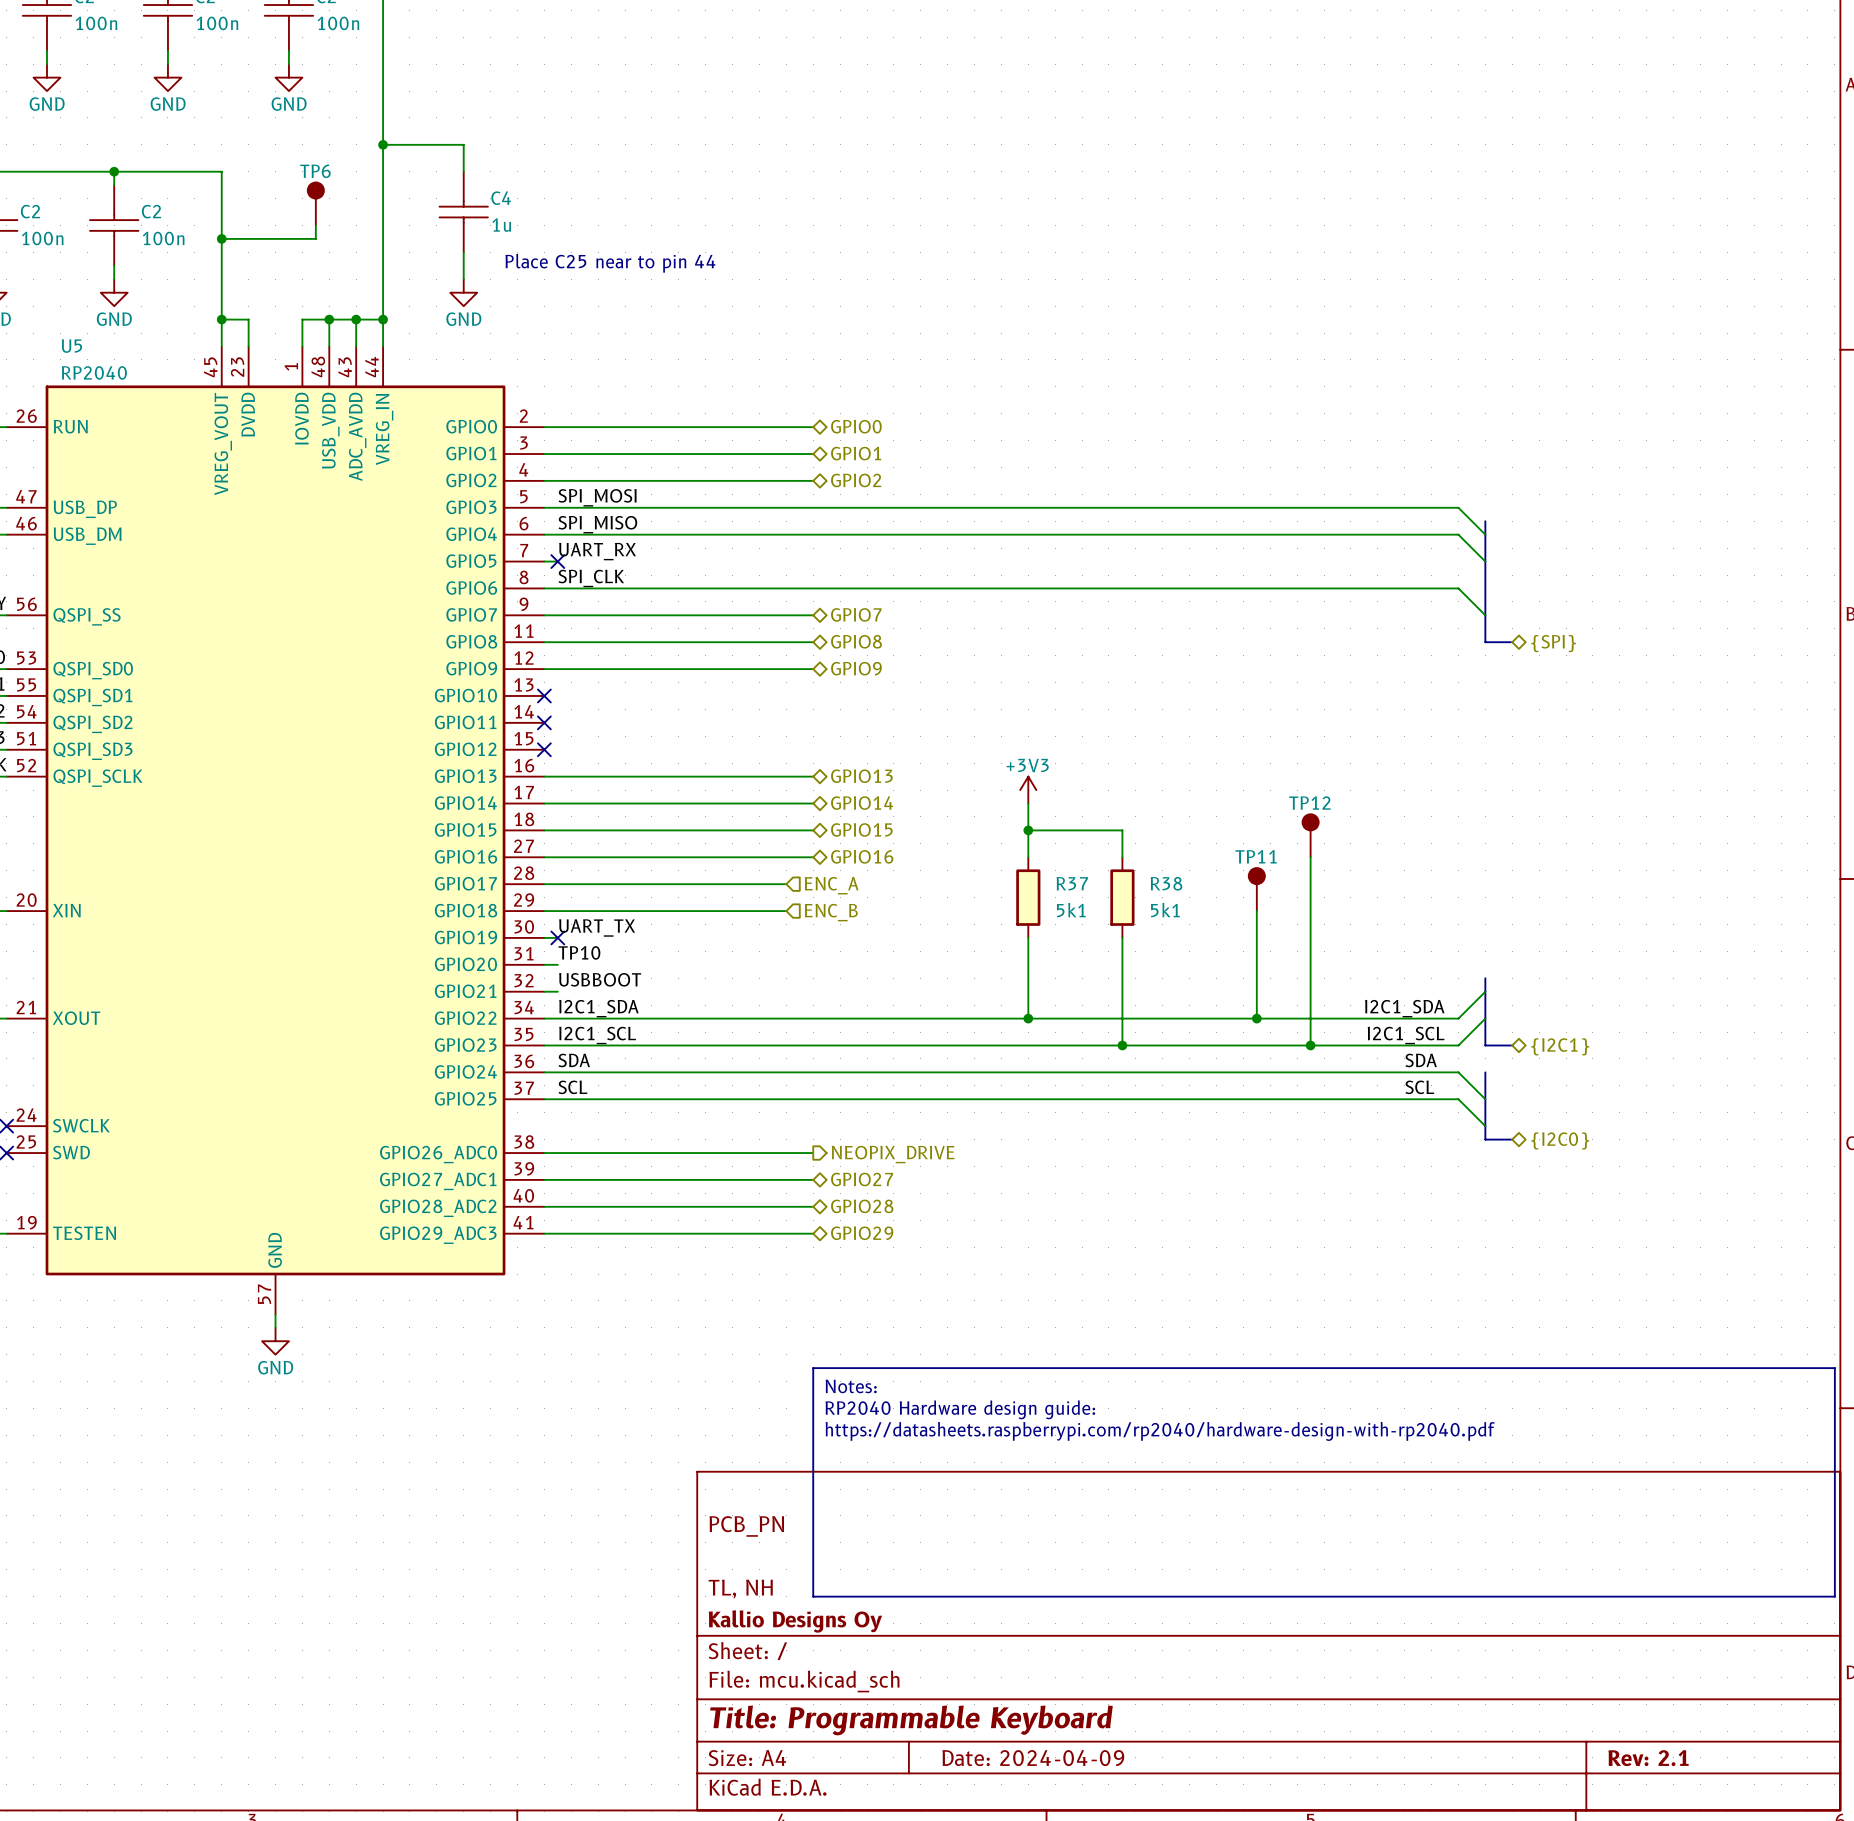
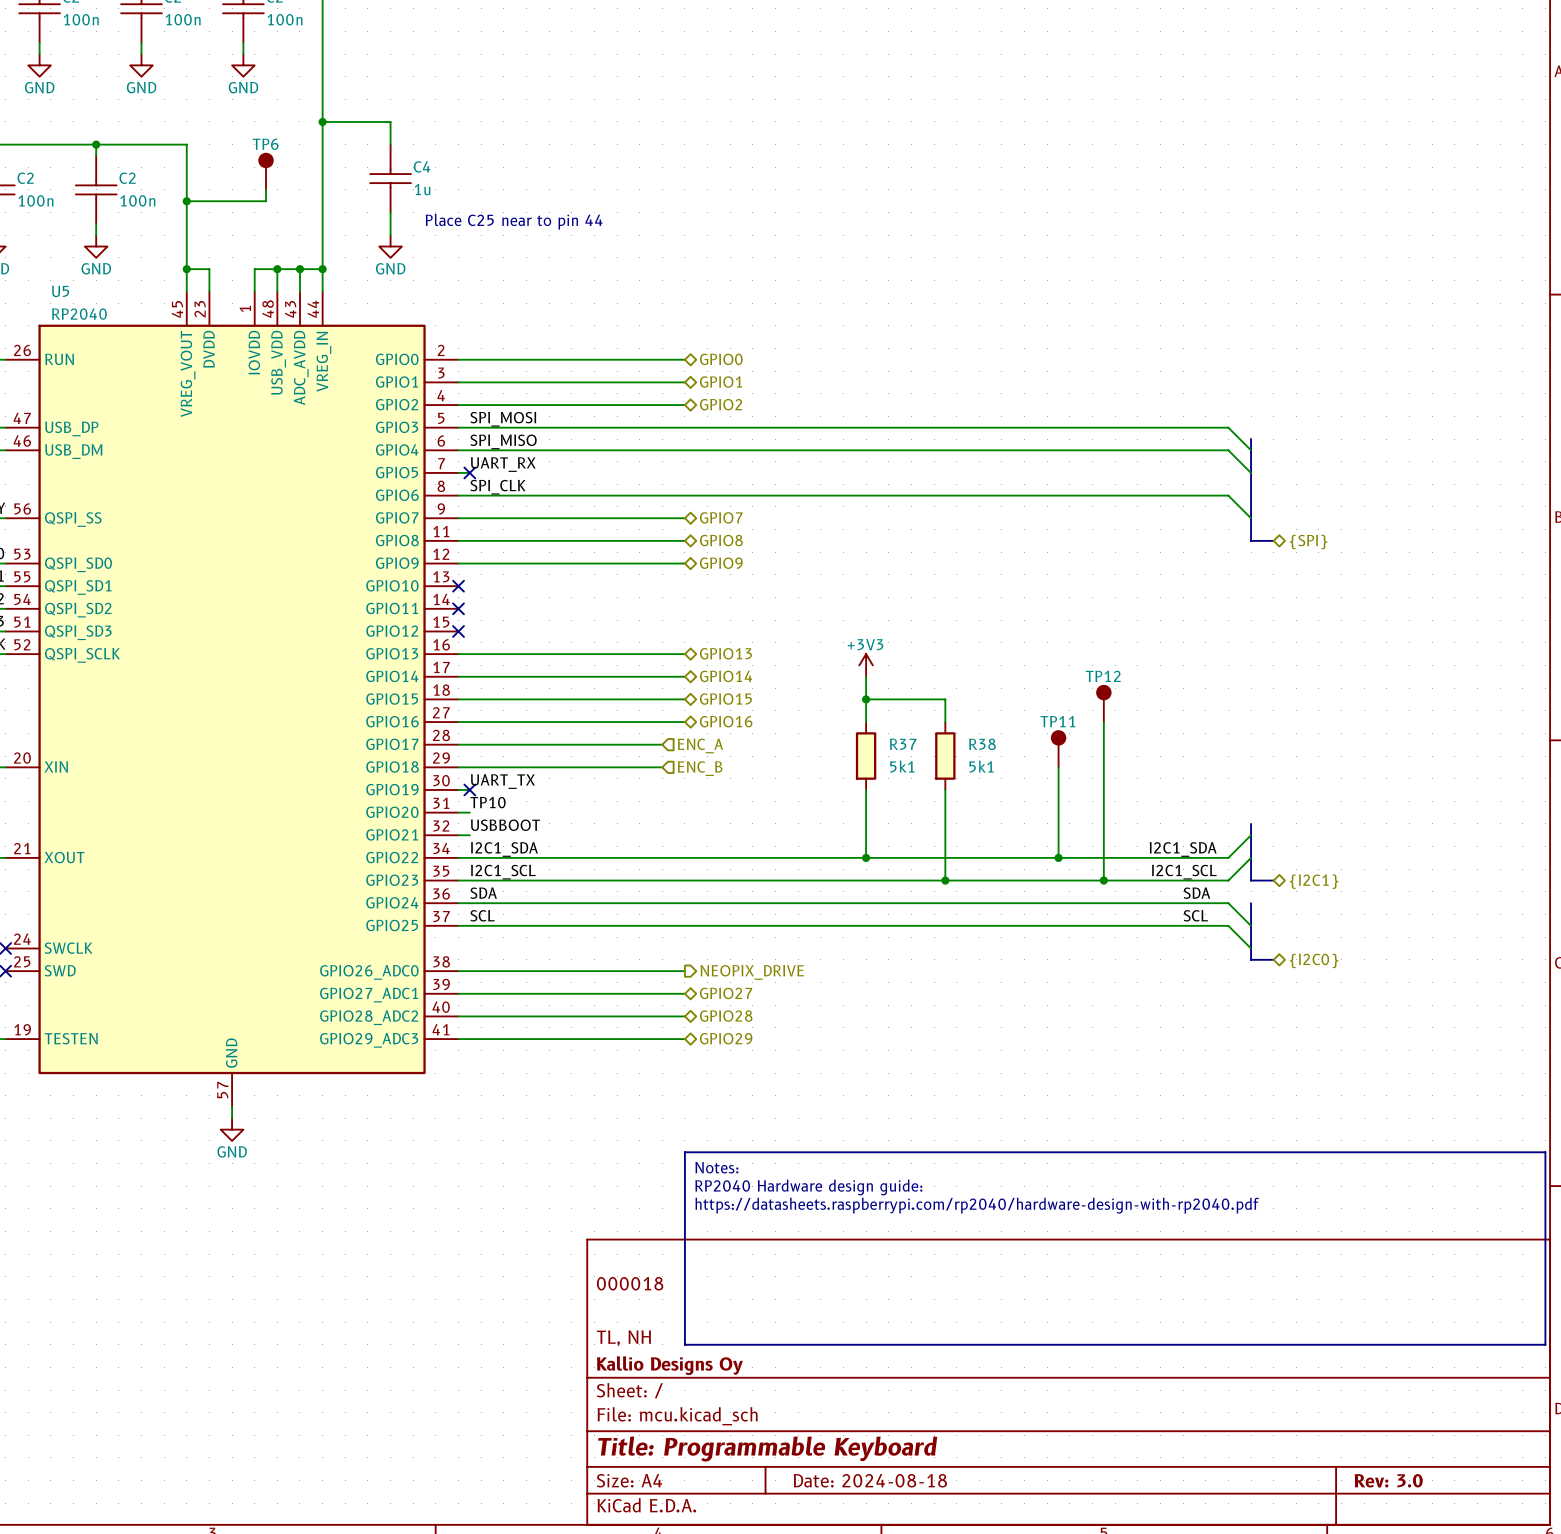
title block: PCB_PN (746, 1526) -> 000018 (630, 1283)
title block: Date: 2024-04-09 (1033, 1758) -> Date: 2024-08-18 (870, 1480)
title block: Rev: 2.1 (1648, 1758) -> Rev: 3.0 (1388, 1480)

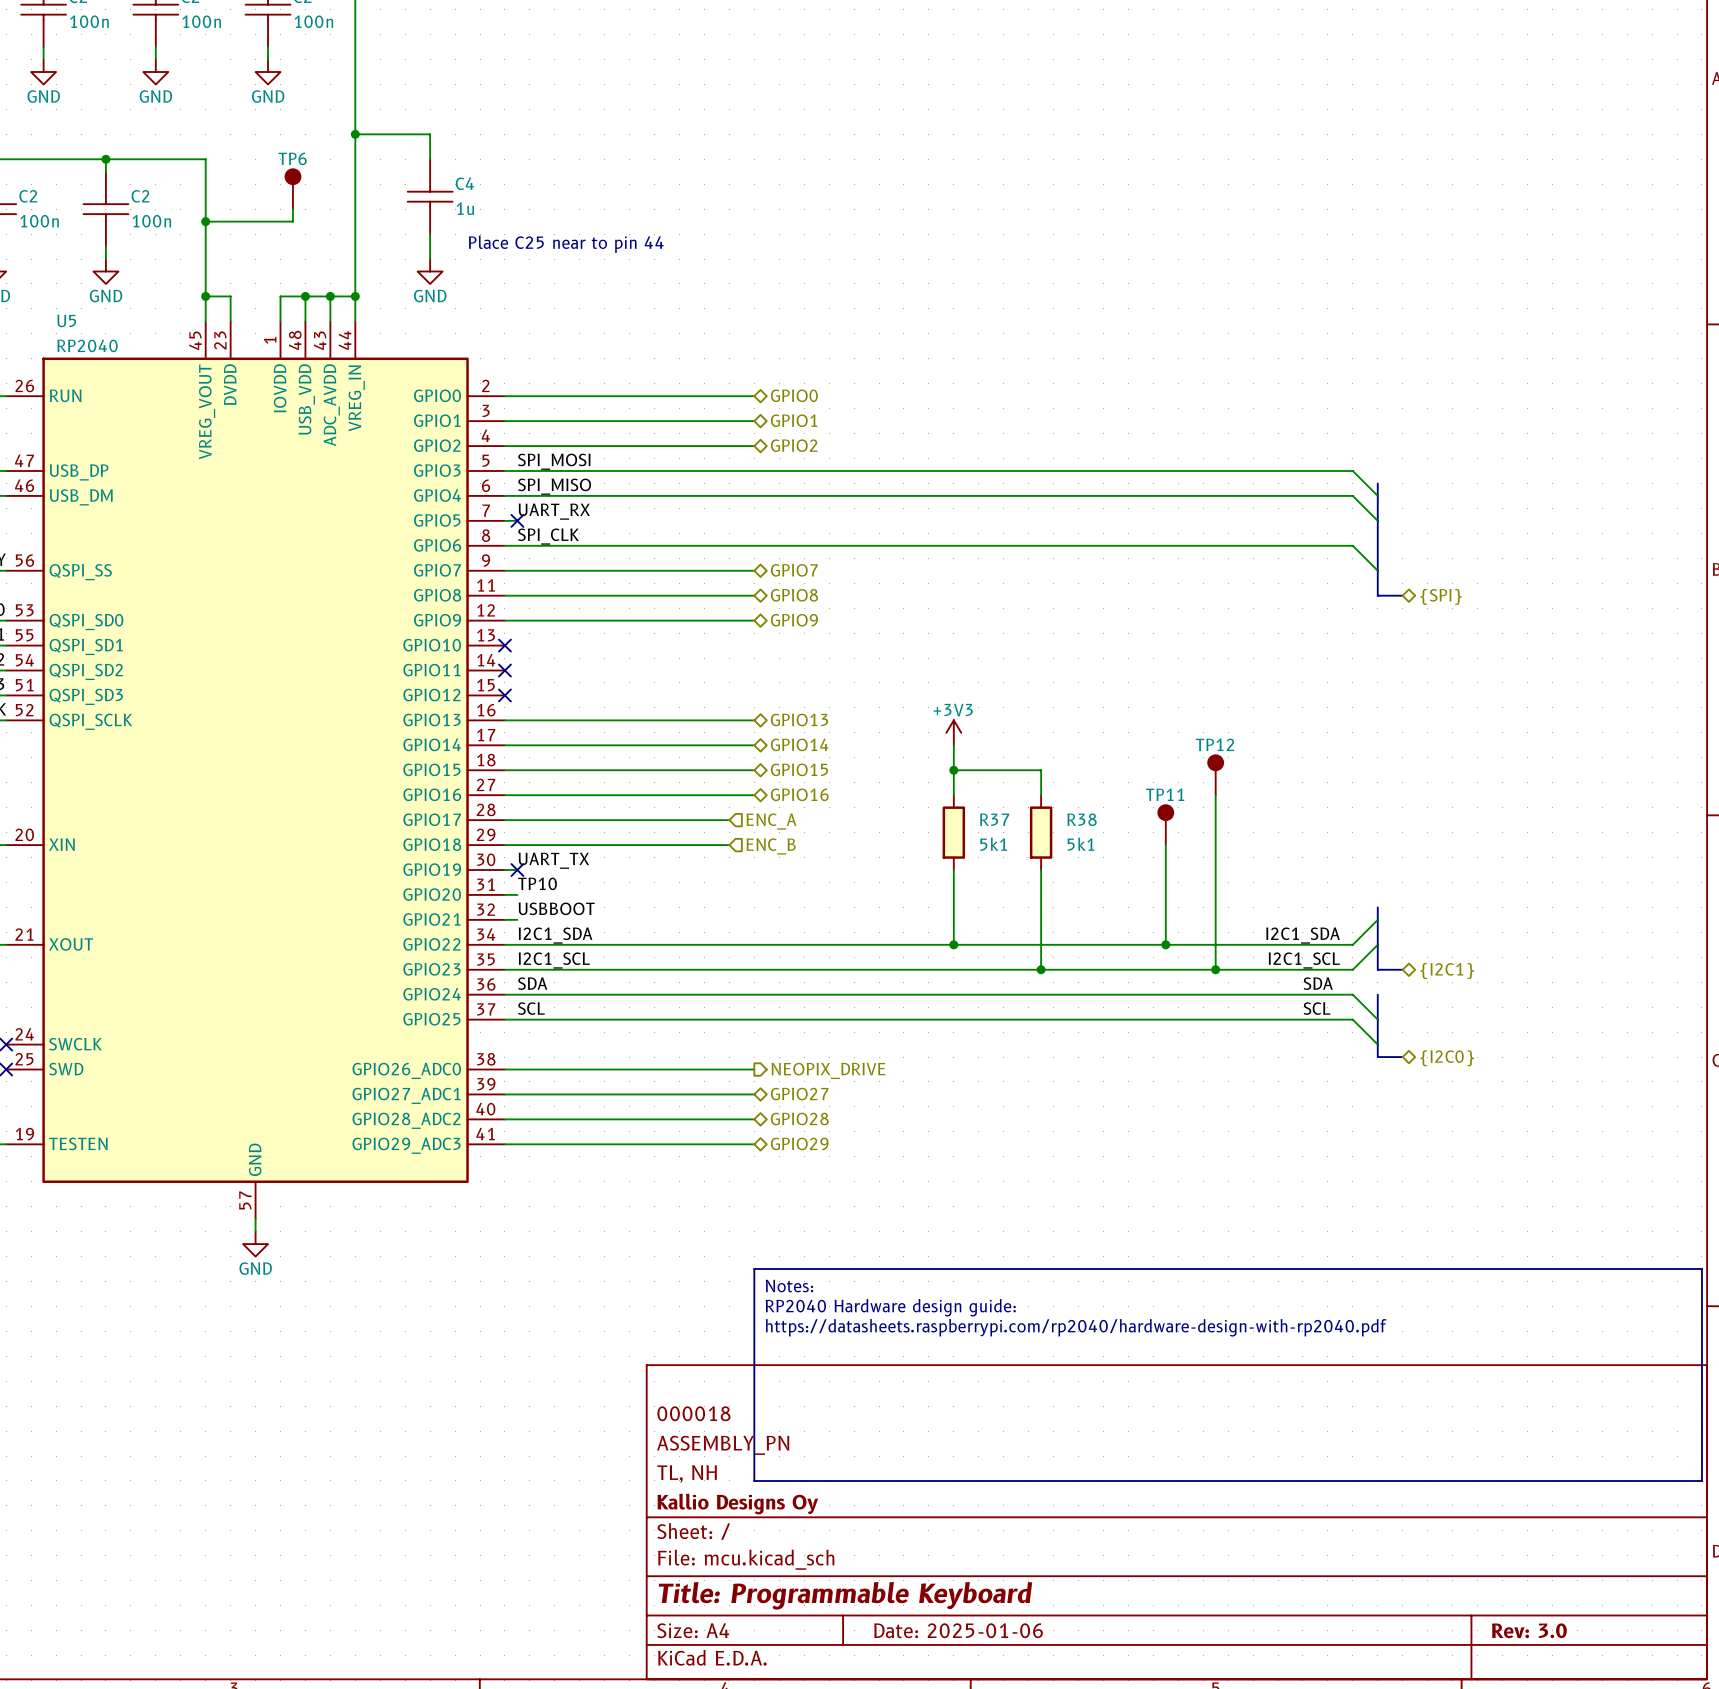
title block: none -> ASSEMBLY_PN (723, 1445)
title block: Date: 2024-08-18 (870, 1480) -> Date: 2025-01-06 (958, 1630)

